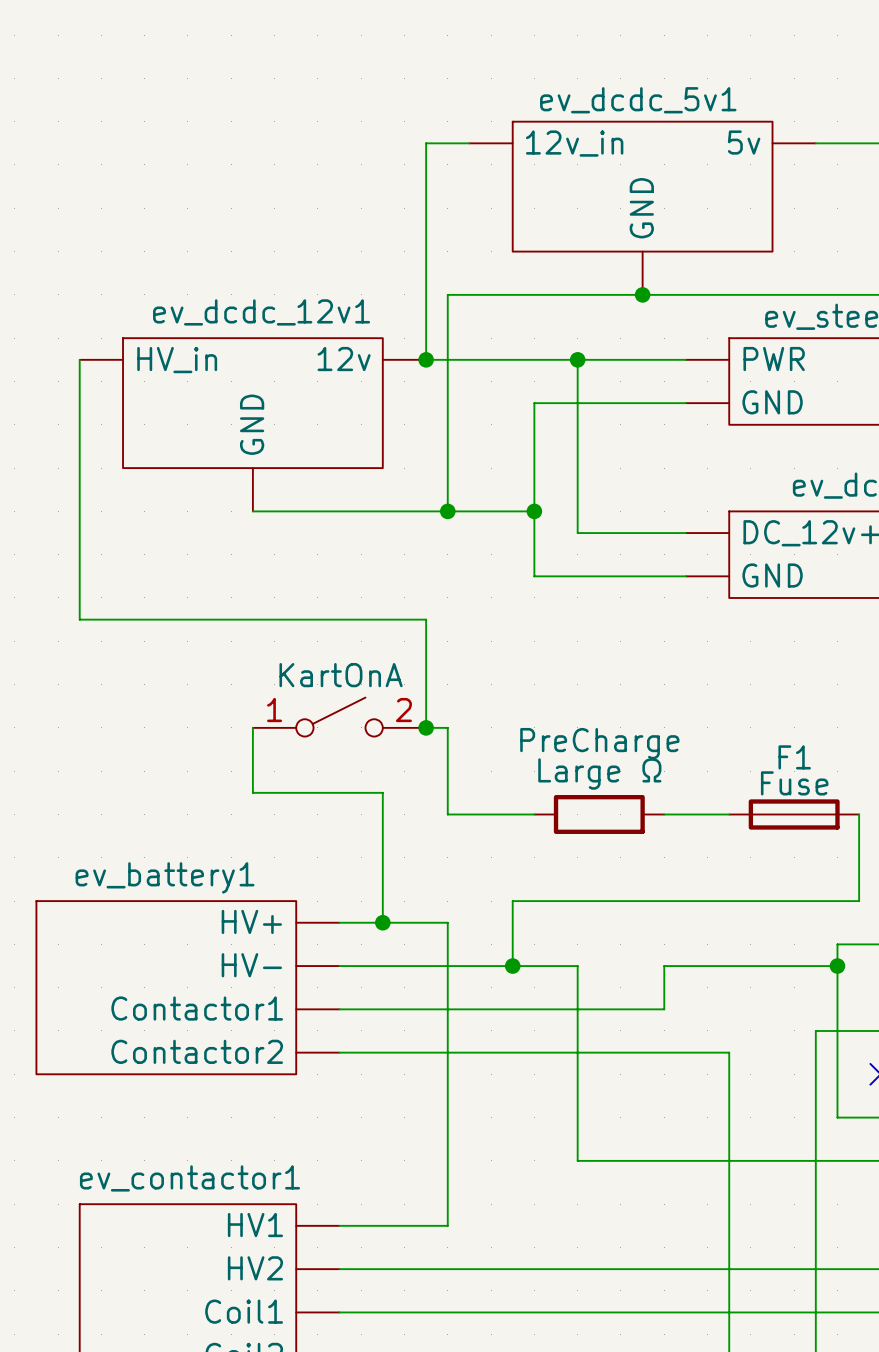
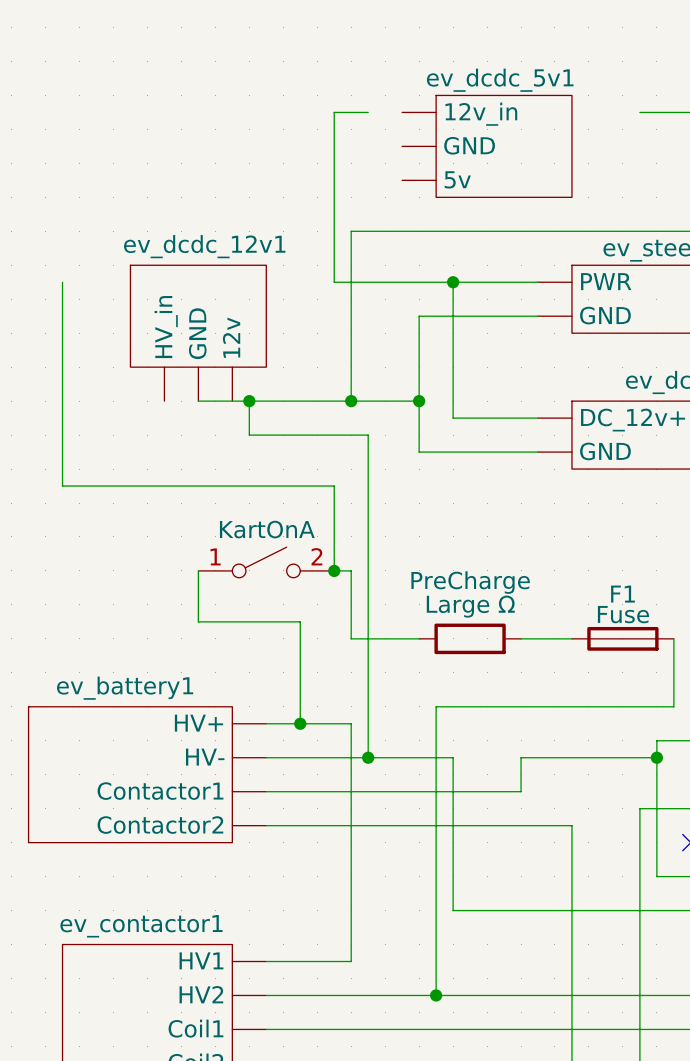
ev_dcdc_5v1 symbol: [469, 121, 816, 295] -> [402, 95, 572, 198]
junction: (642, 294) -> none
ev_dcdc_12v1 symbol: [79, 338, 427, 512] -> [130, 265, 267, 402]
junction: (426, 359) -> none
wire: none -> (249, 401) (249, 435) (368, 435) (368, 757)
junction: none -> (249, 401)
wire: (556, 901) (512, 901) (512, 966) -> (436, 706) (436, 995)
junction position: (512, 966) -> (368, 757)
junction: none -> (436, 995)

